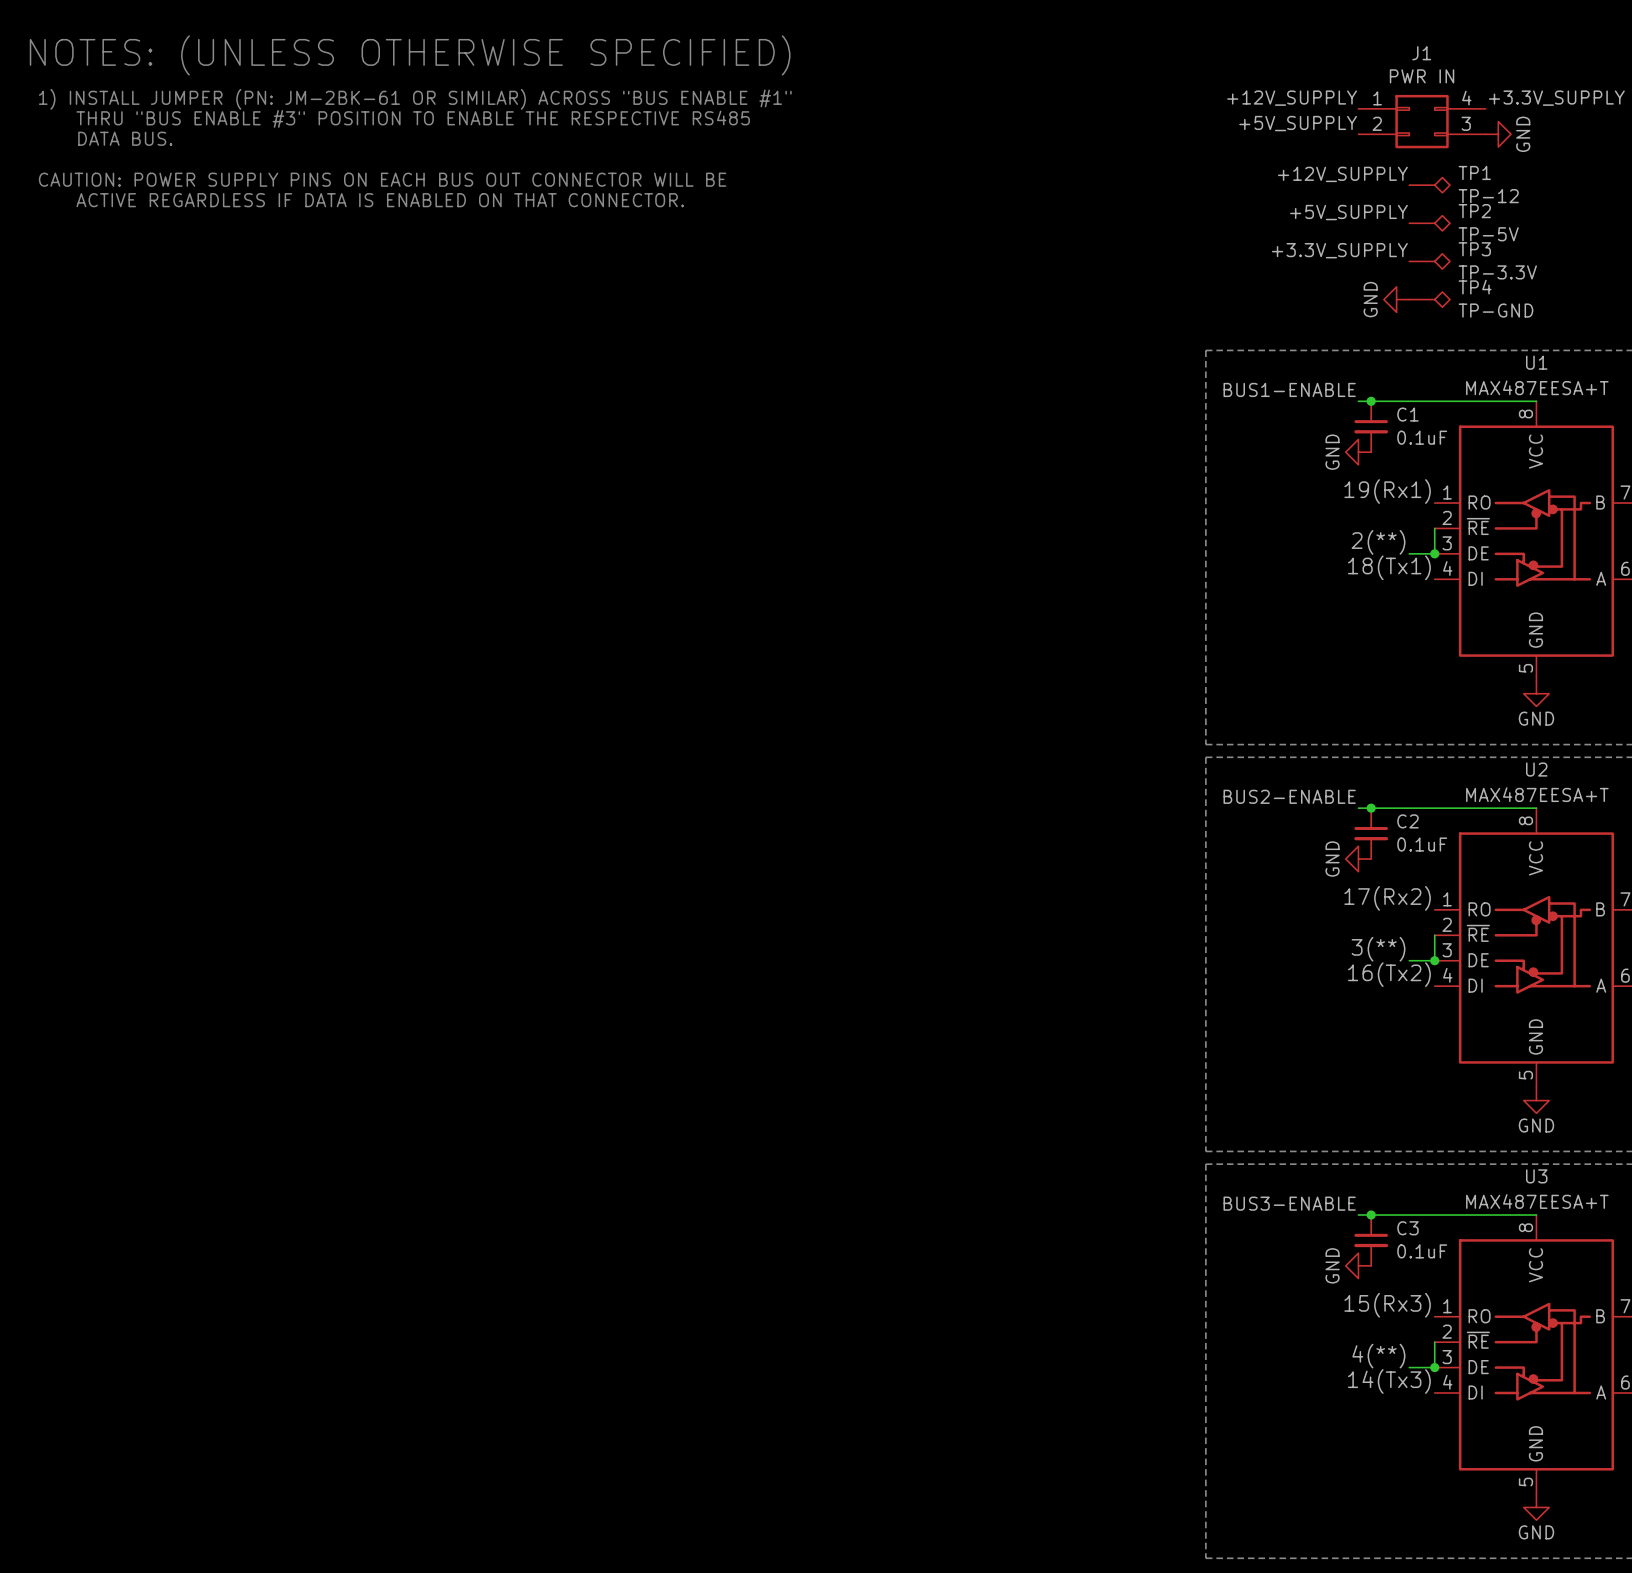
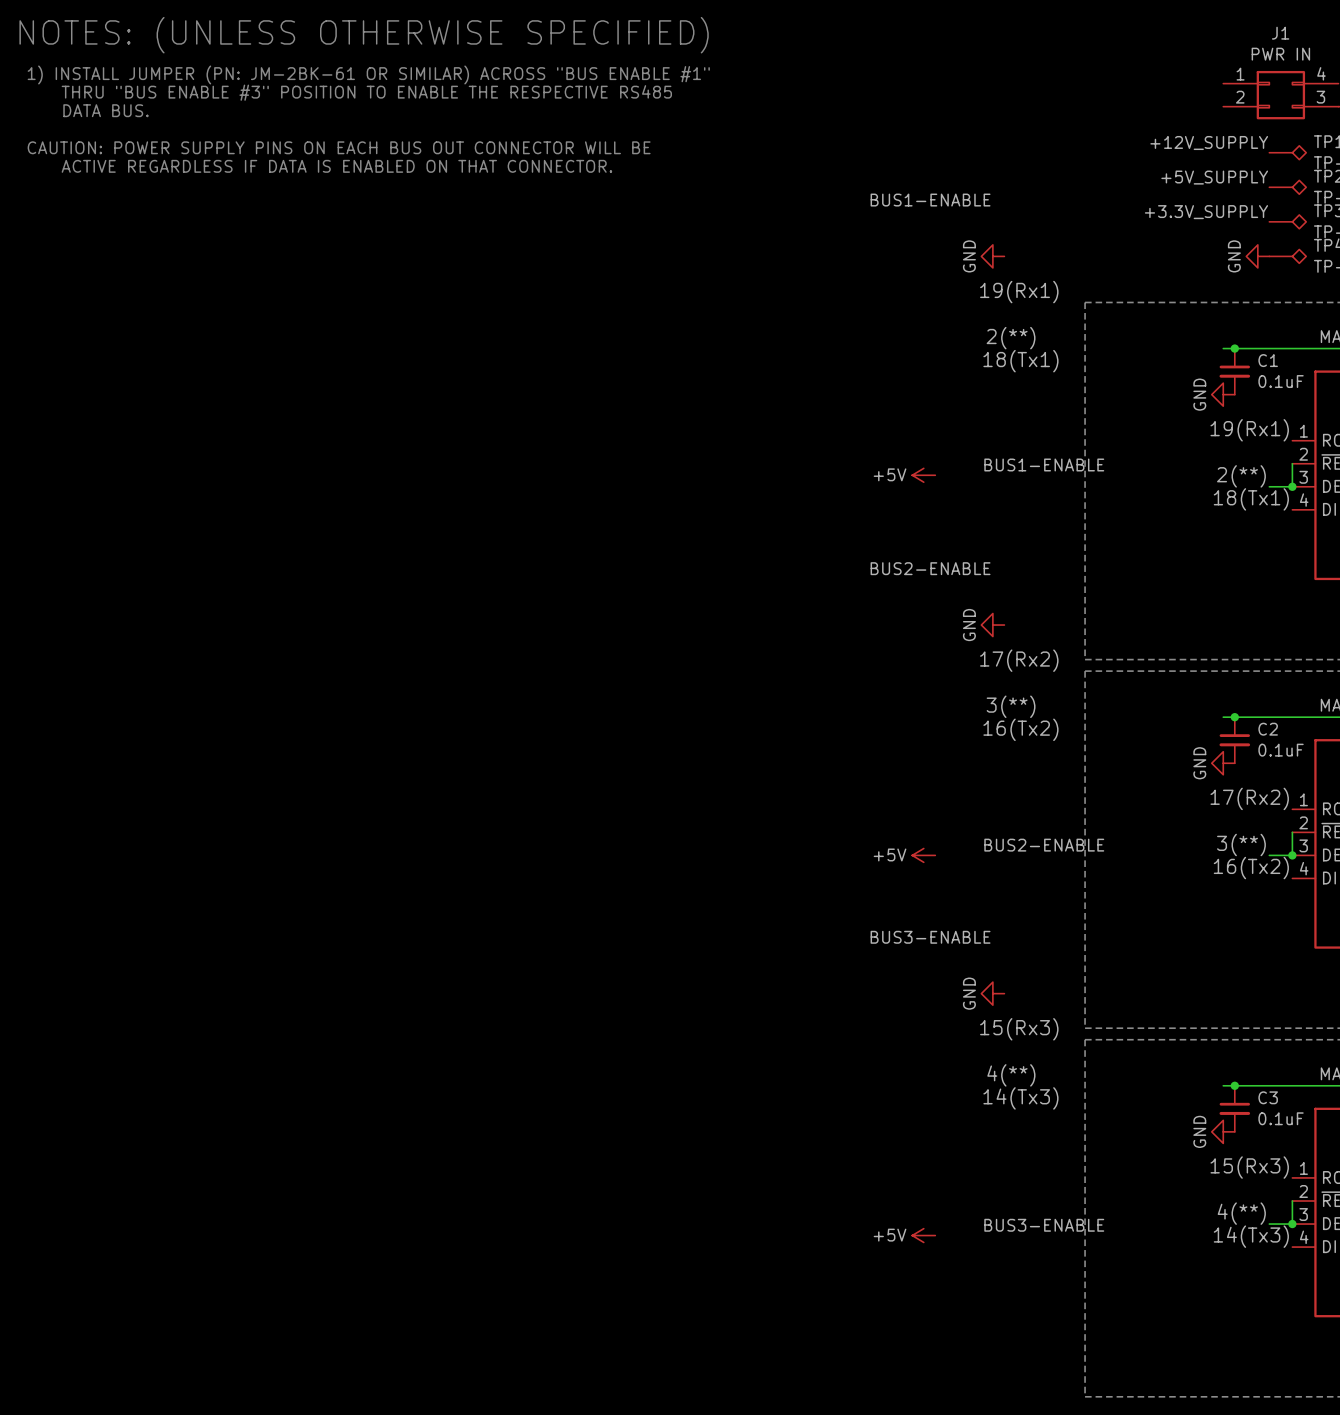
label: +12V_SUPPLY (1292, 98) -> none
label: +5V_SUPPLY (1298, 123) -> none
label: none -> BUS1-ENABLE (930, 200)
power symbol: none -> GND (992, 256)
label: none -> 19(Rx1) (1019, 292)
label: none -> 2(**) (1011, 338)
label: BUS1-ENABLE (1289, 389) -> none
label: none -> 18(Tx1) (1020, 361)
label: none -> BUS1-ENABLE (1044, 464)
power symbol: none -> +5V (923, 475)
label: none -> BUS2-ENABLE (930, 568)
power symbol: none -> GND (992, 625)
label: none -> 17(Rx2) (1019, 660)
label: none -> 3(**) (1011, 706)
label: BUS2-ENABLE (1289, 796) -> none
label: none -> 16(Tx2) (1020, 729)
label: none -> BUS2-ENABLE (1044, 845)
power symbol: none -> +5V (923, 855)
label: none -> BUS3-ENABLE (930, 937)
power symbol: none -> GND (992, 993)
label: none -> 15(Rx3) (1019, 1029)
label: none -> 4(**) (1011, 1075)
label: BUS3-ENABLE (1289, 1203) -> none
label: none -> 14(Tx3) (1020, 1098)
label: none -> BUS3-ENABLE (1044, 1225)
power symbol: none -> +5V (923, 1235)

